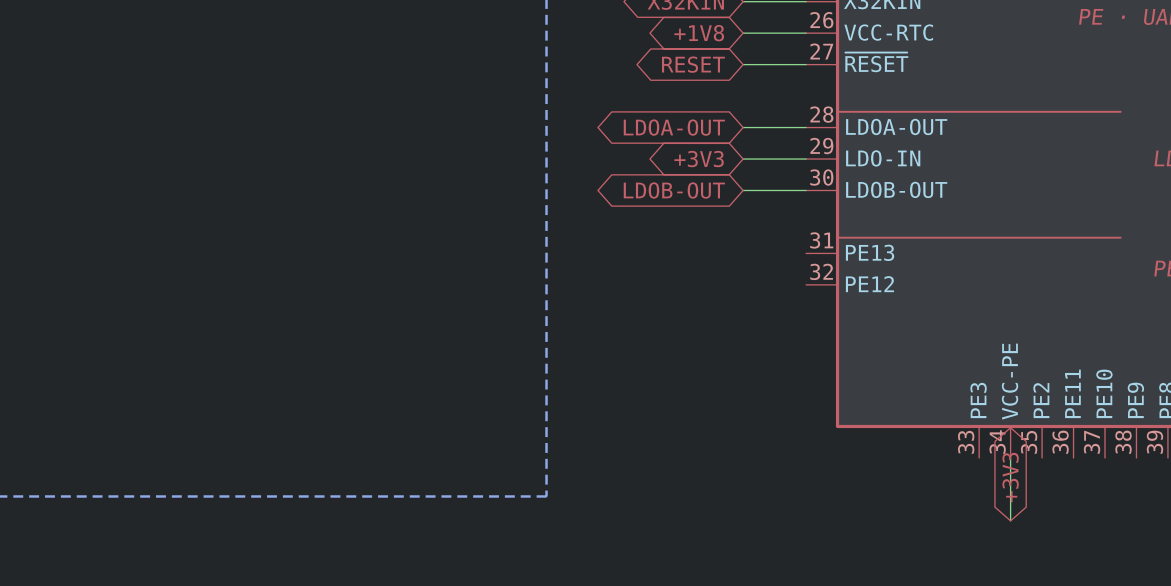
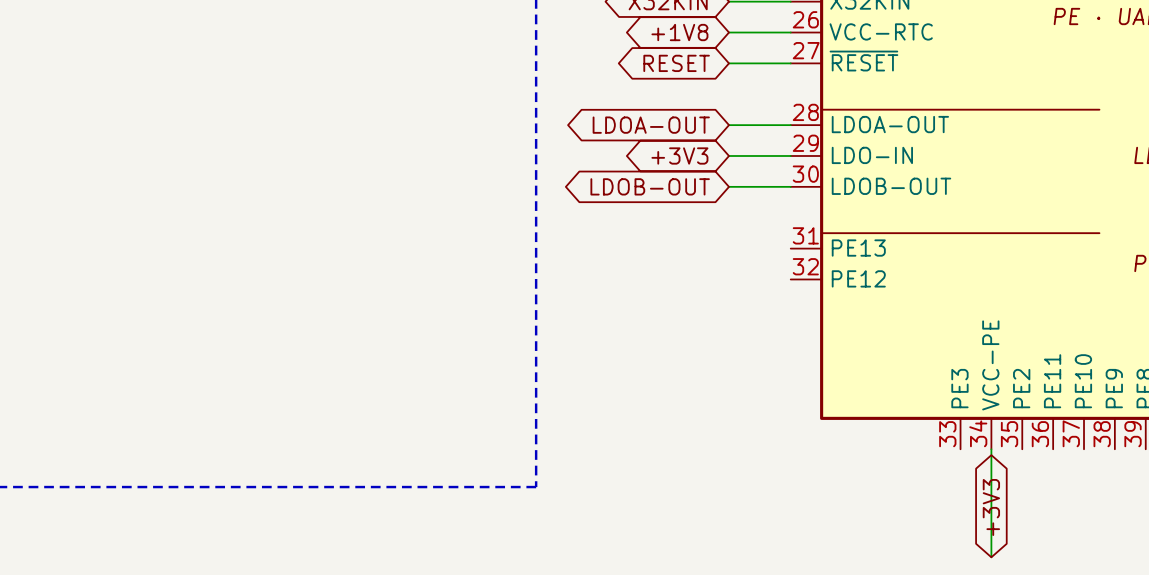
global label position: +3V3 (1010, 477) -> +3V3 (991, 507)
wire: none -> (991, 510) (991, 557)

